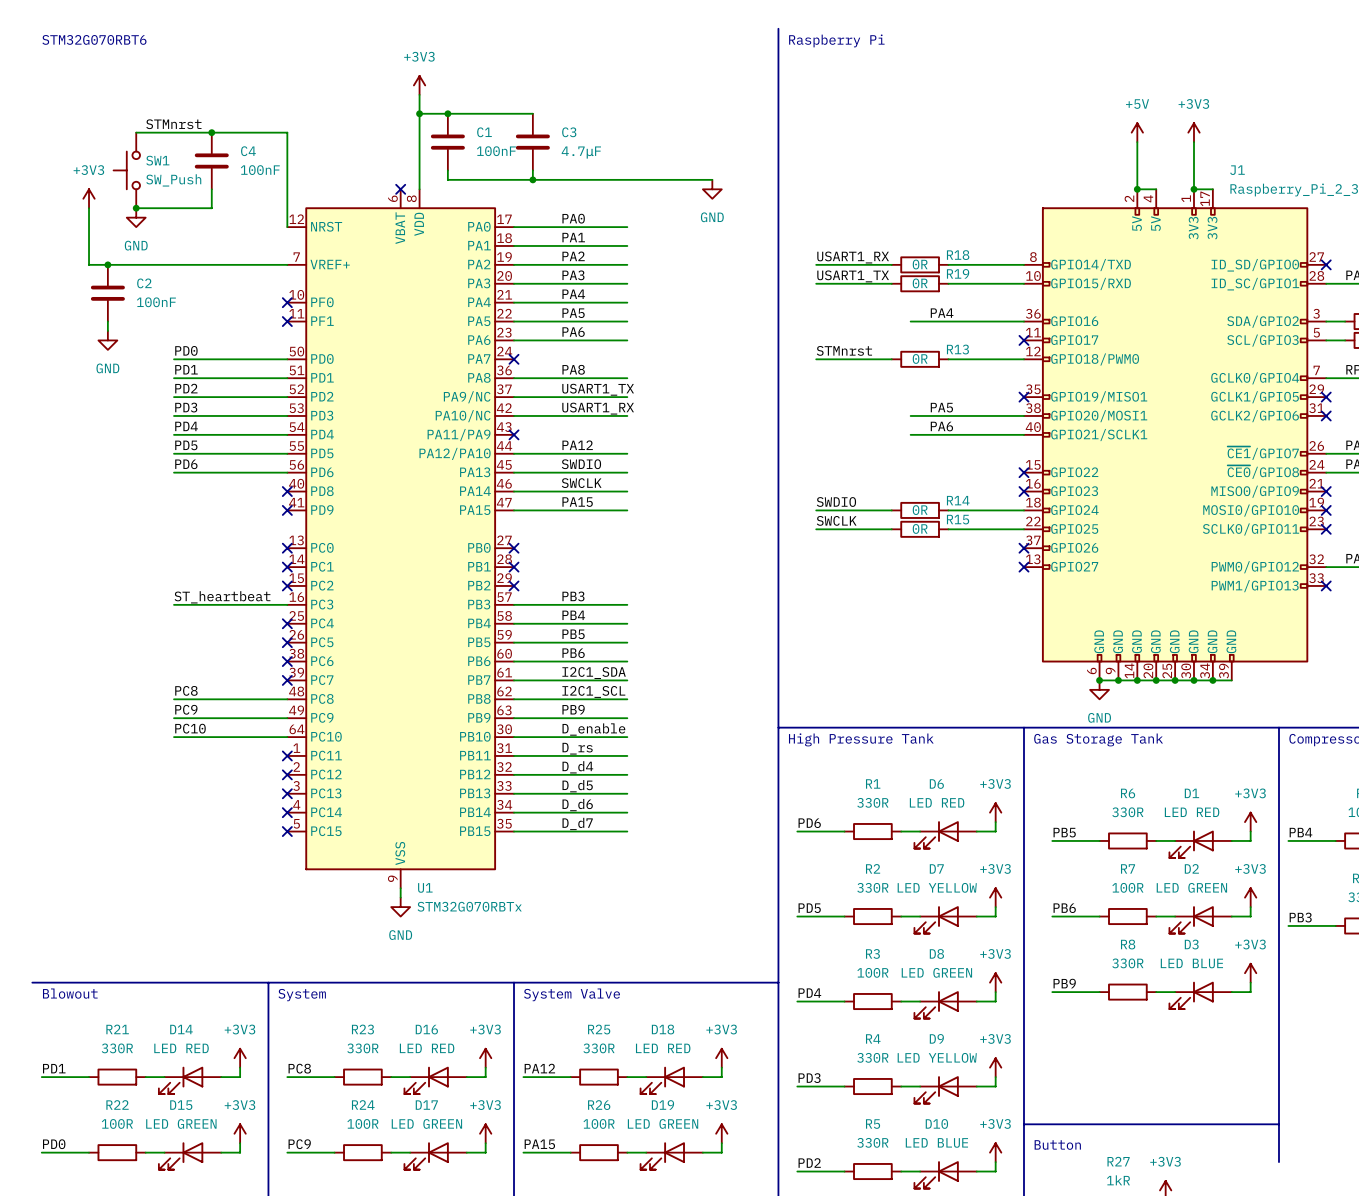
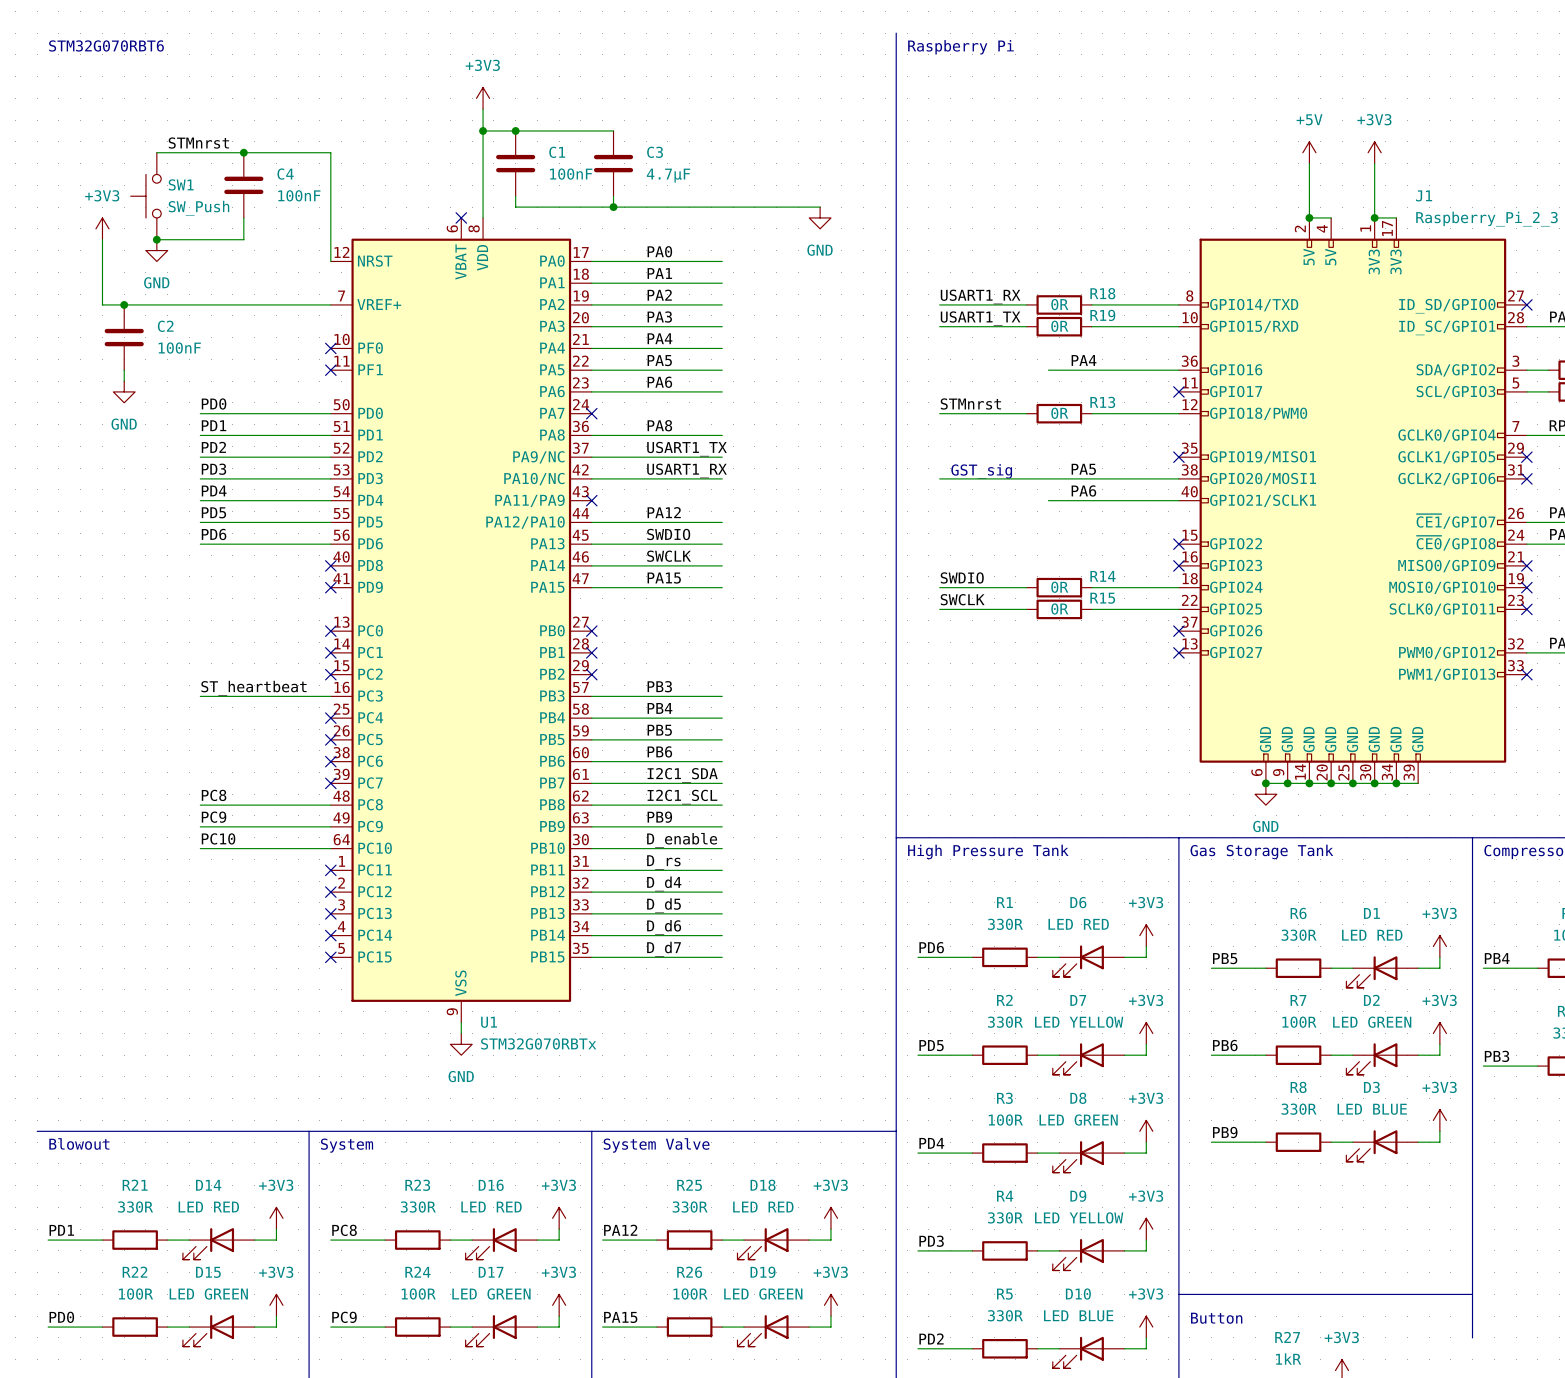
text: none -> GST_sig (981, 471)
wire: none -> (939, 478) (1048, 478)

